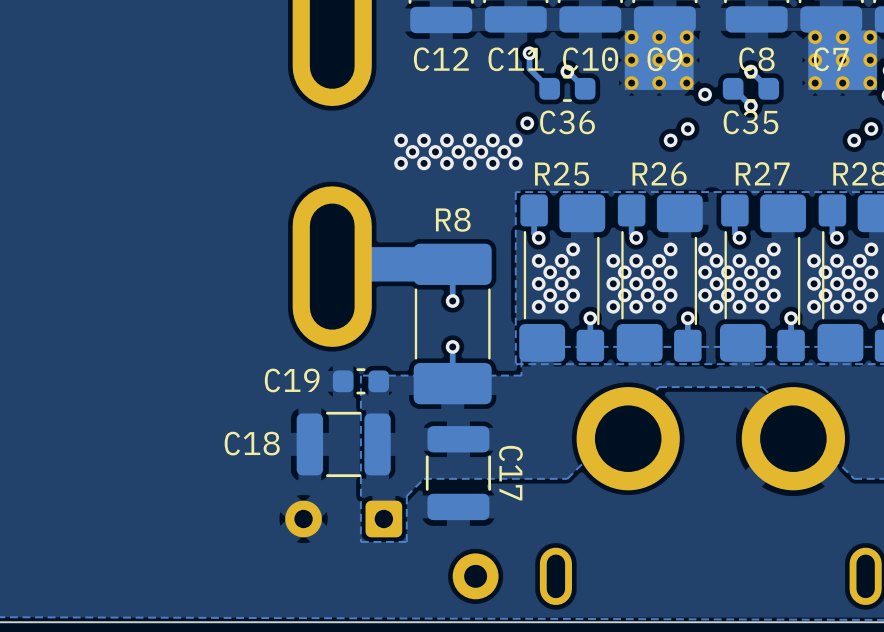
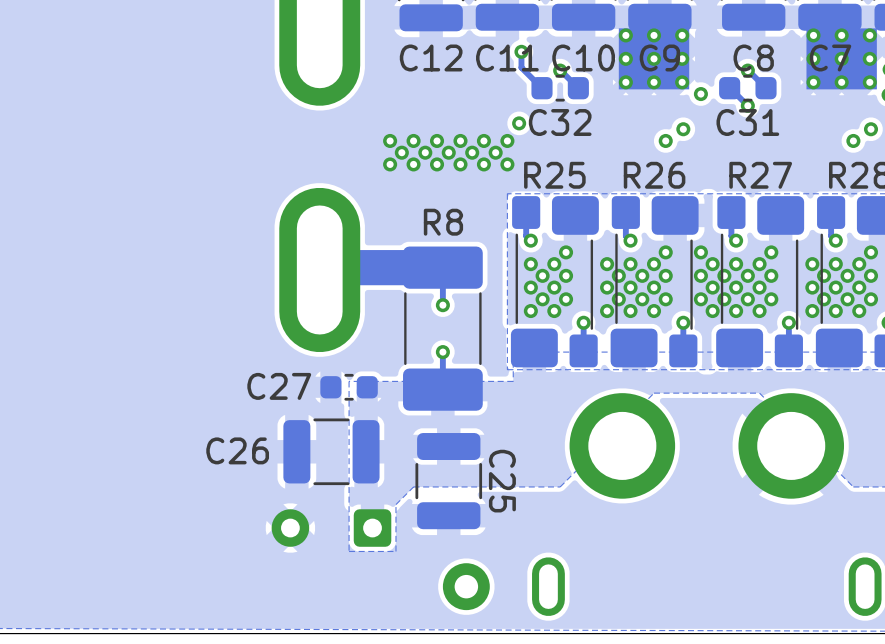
C36 name: C36 (567, 122) -> C32 (560, 122)
C35 name: C35 (750, 122) -> C31 (747, 122)
C19 name: C19 (292, 380) -> C27 (279, 386)
C18 name: C18 (252, 443) -> C26 (237, 450)
C17 name: C17 (510, 473) -> C25 (502, 481)

